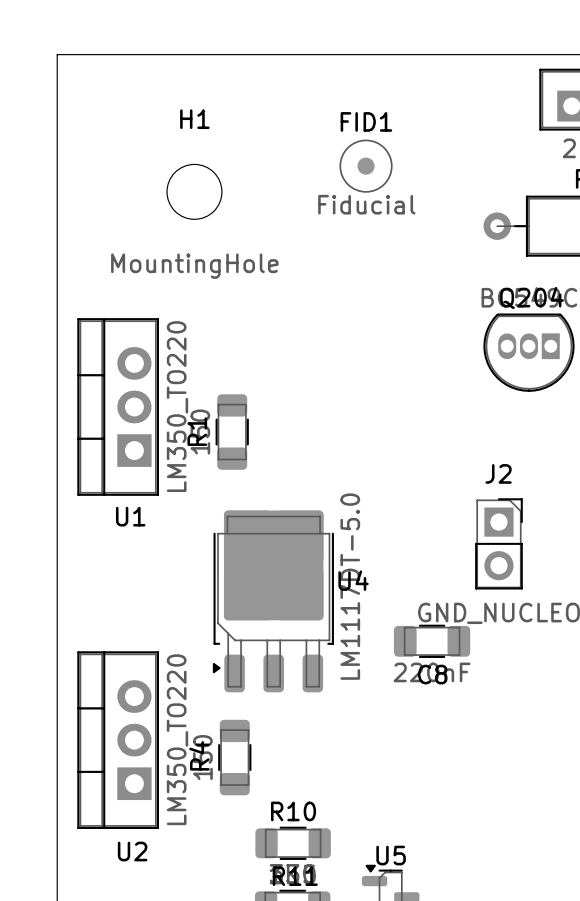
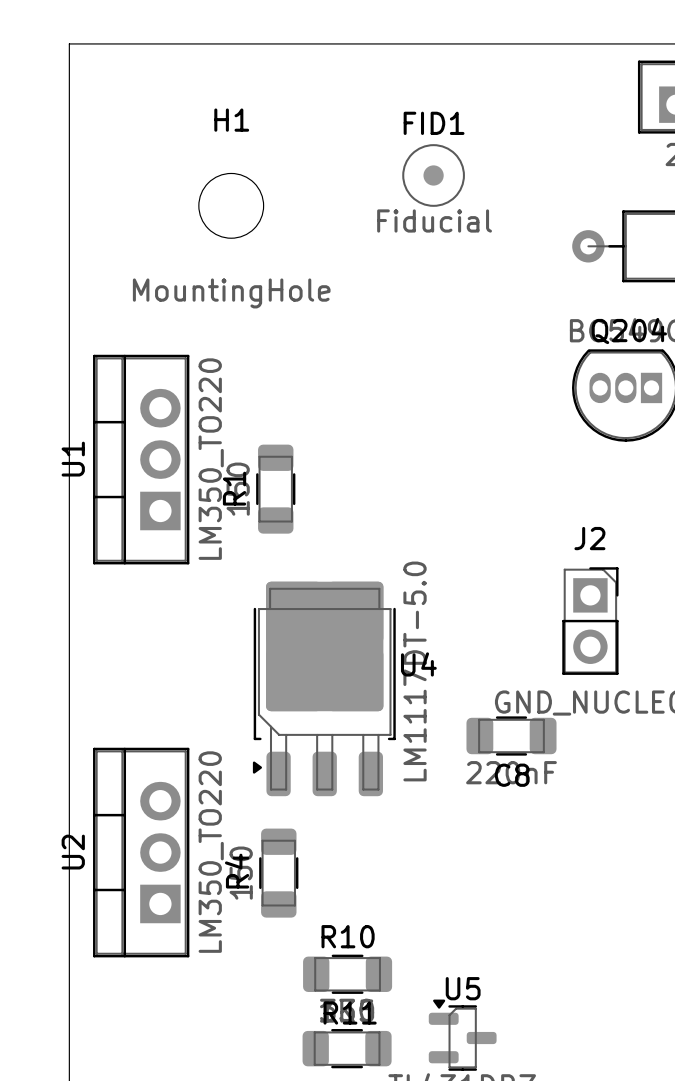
U1 name rotation: 0° (130, 516) -> 90° counterclockwise (73, 459)
U1 name position: U1 (130, 516) -> U1 (73, 459)
U2 name rotation: 0° (132, 851) -> 90° counterclockwise (73, 852)
U2 name position: U2 (132, 851) -> U2 (73, 852)

